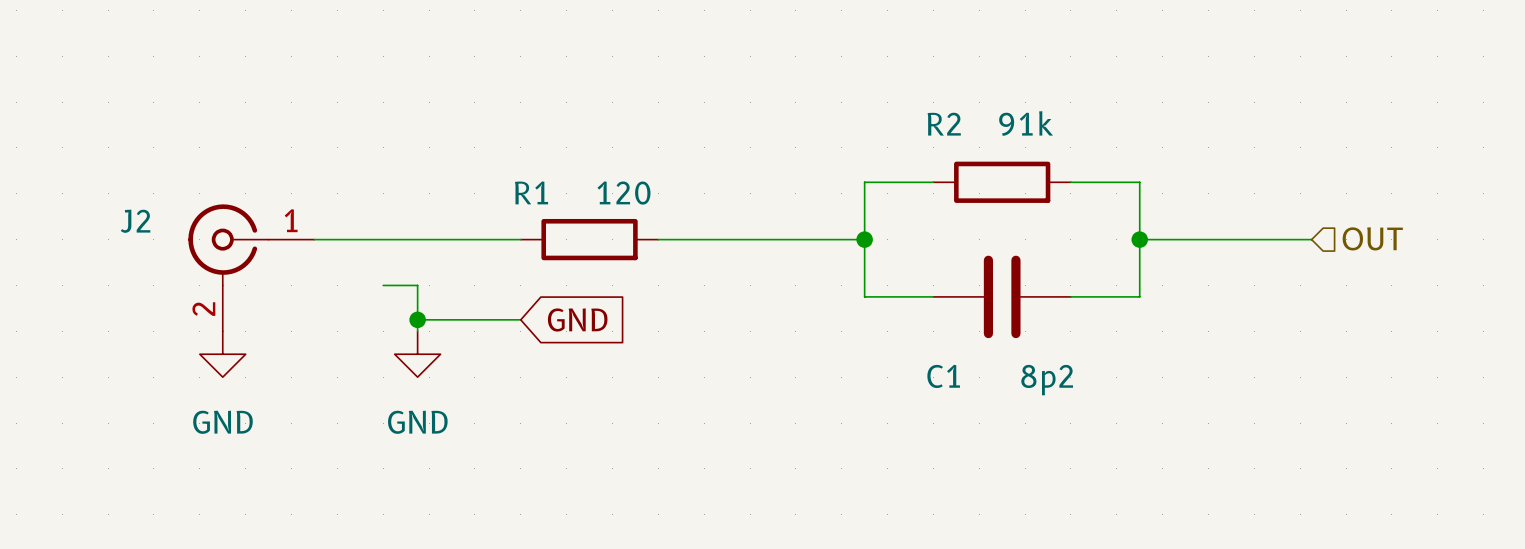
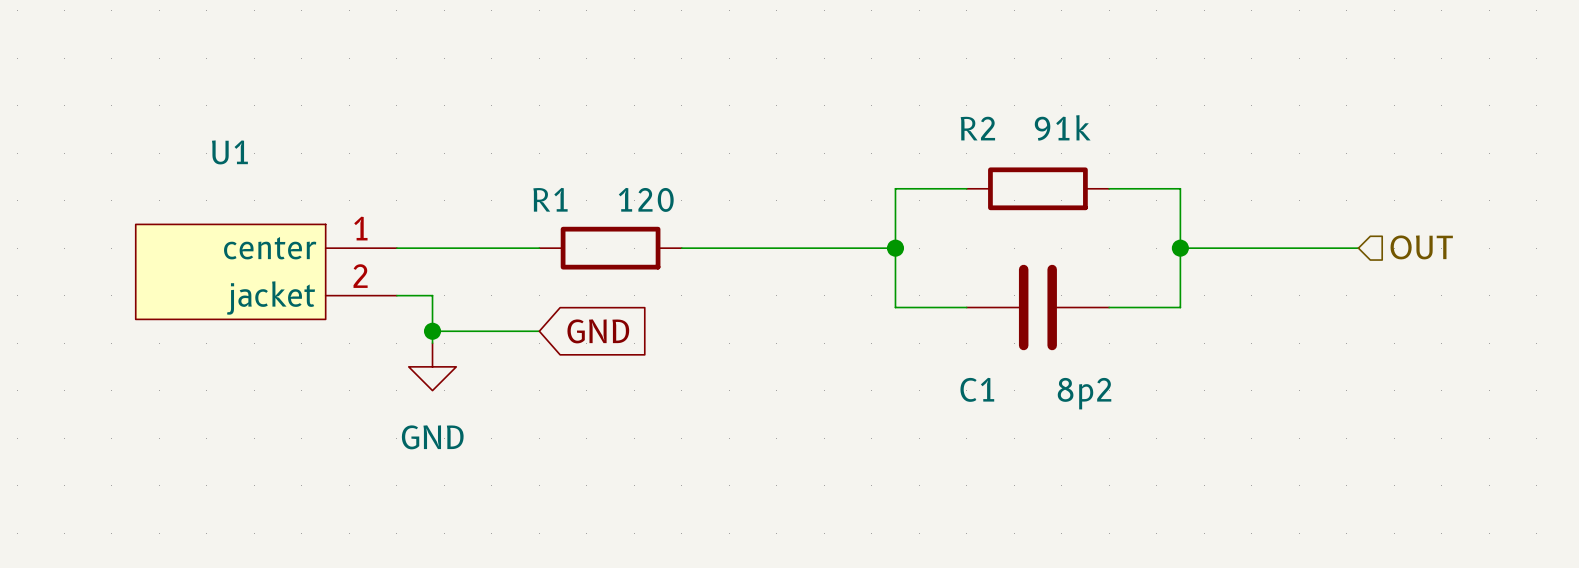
U1: none -> (266, 271)
J2: (251, 267) -> none
power symbol: GND (222, 354) -> none

